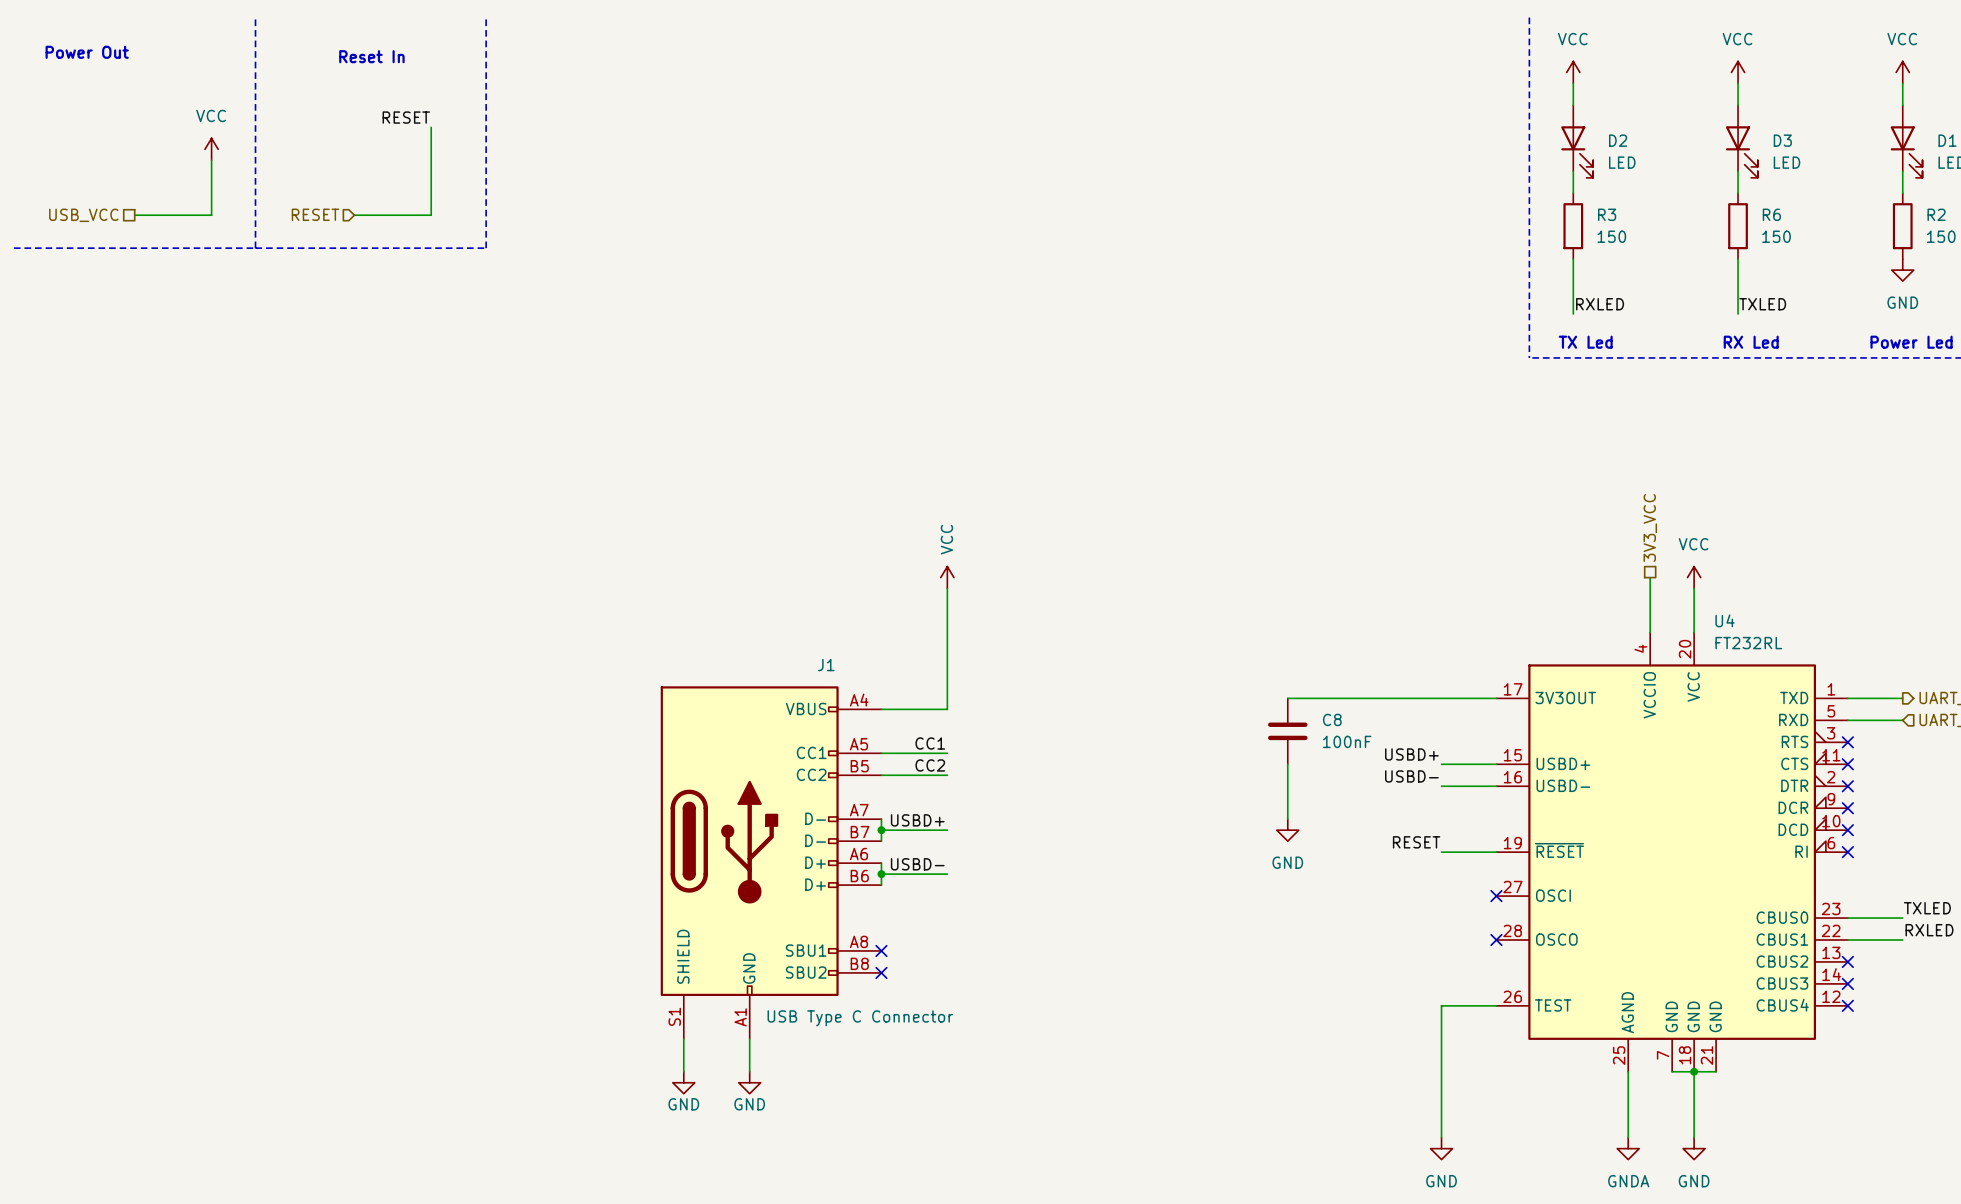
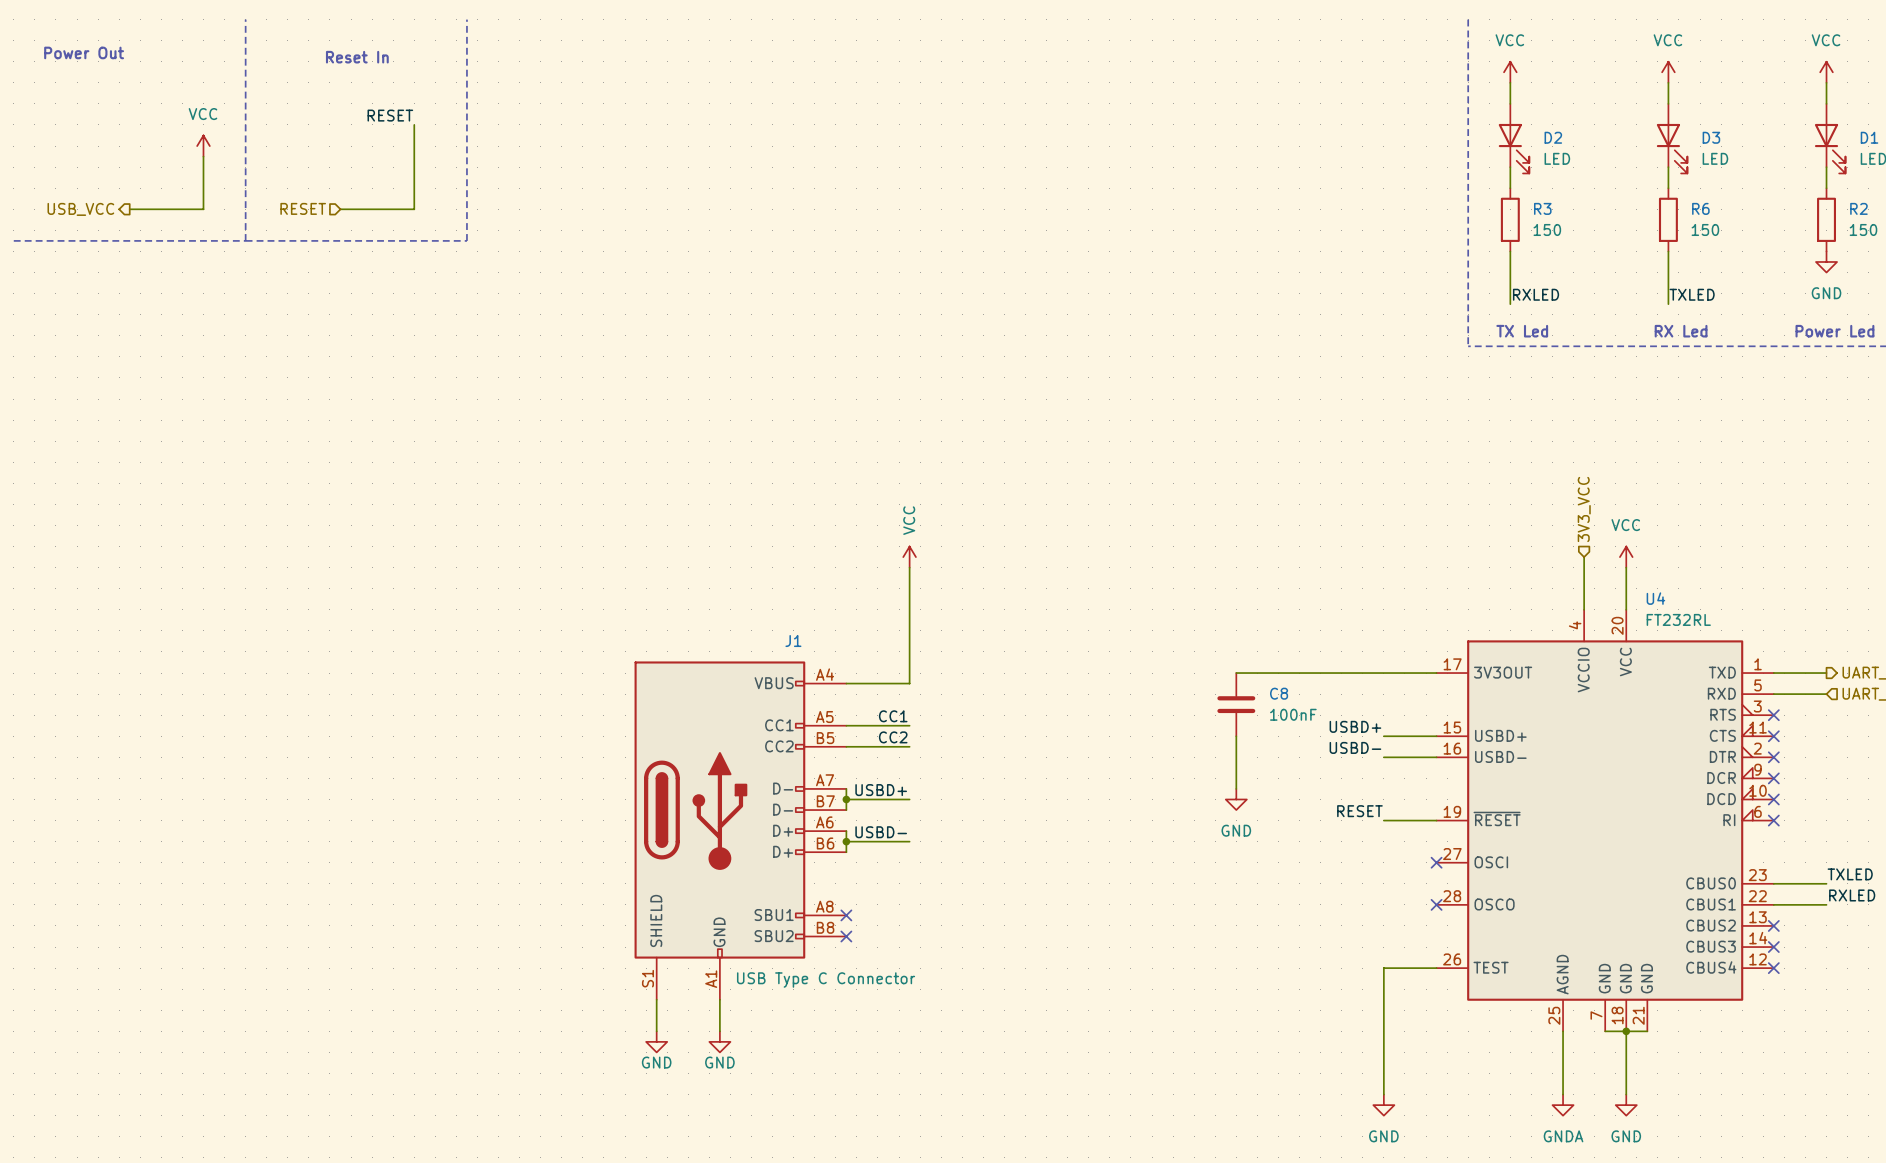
hierarchical label shape: passive (83, 215) -> output (80, 209)
hierarchical label shape: passive (1650, 528) -> input (1584, 509)

